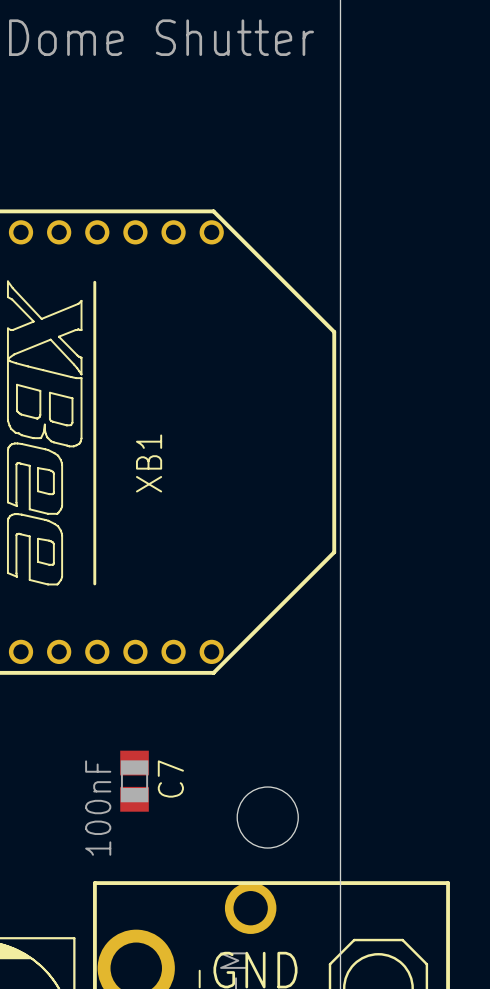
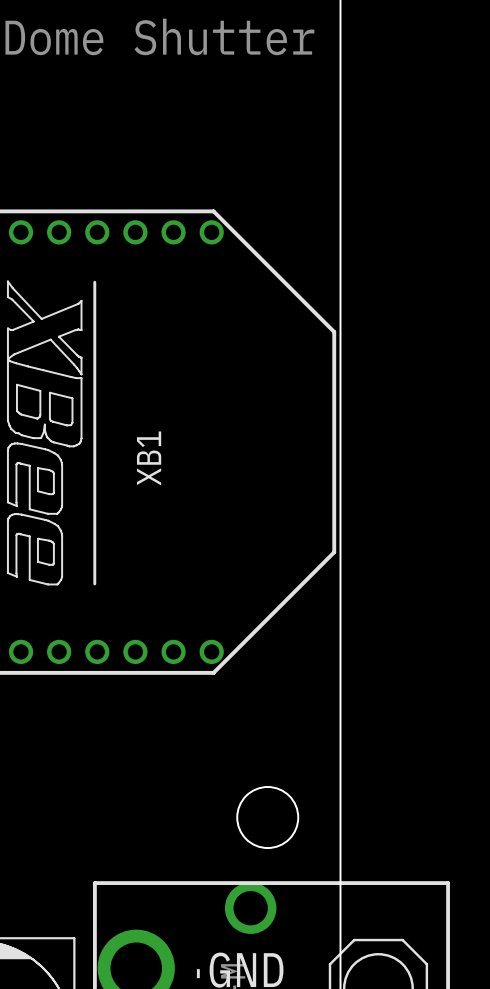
C7: 100nF (134, 781) -> none

